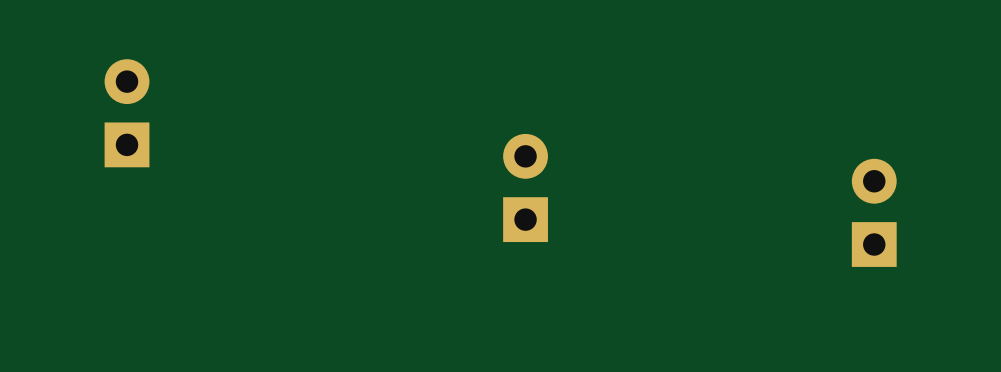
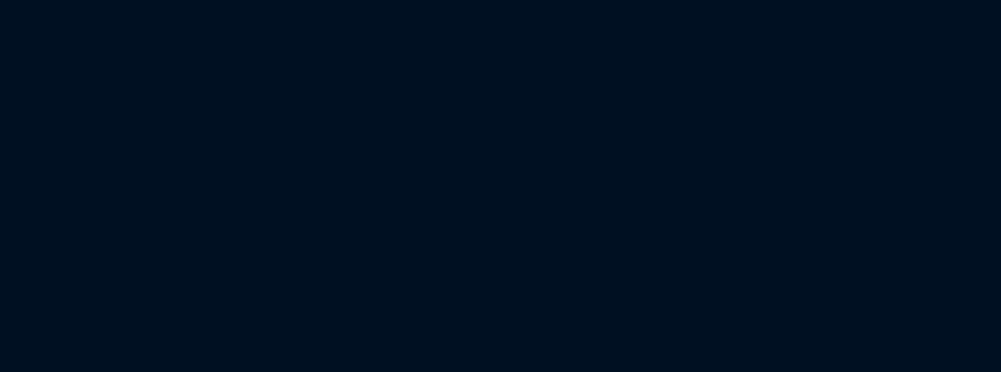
part: (127, 113) -> none
part: (525, 187) -> none
part: (874, 212) -> none

